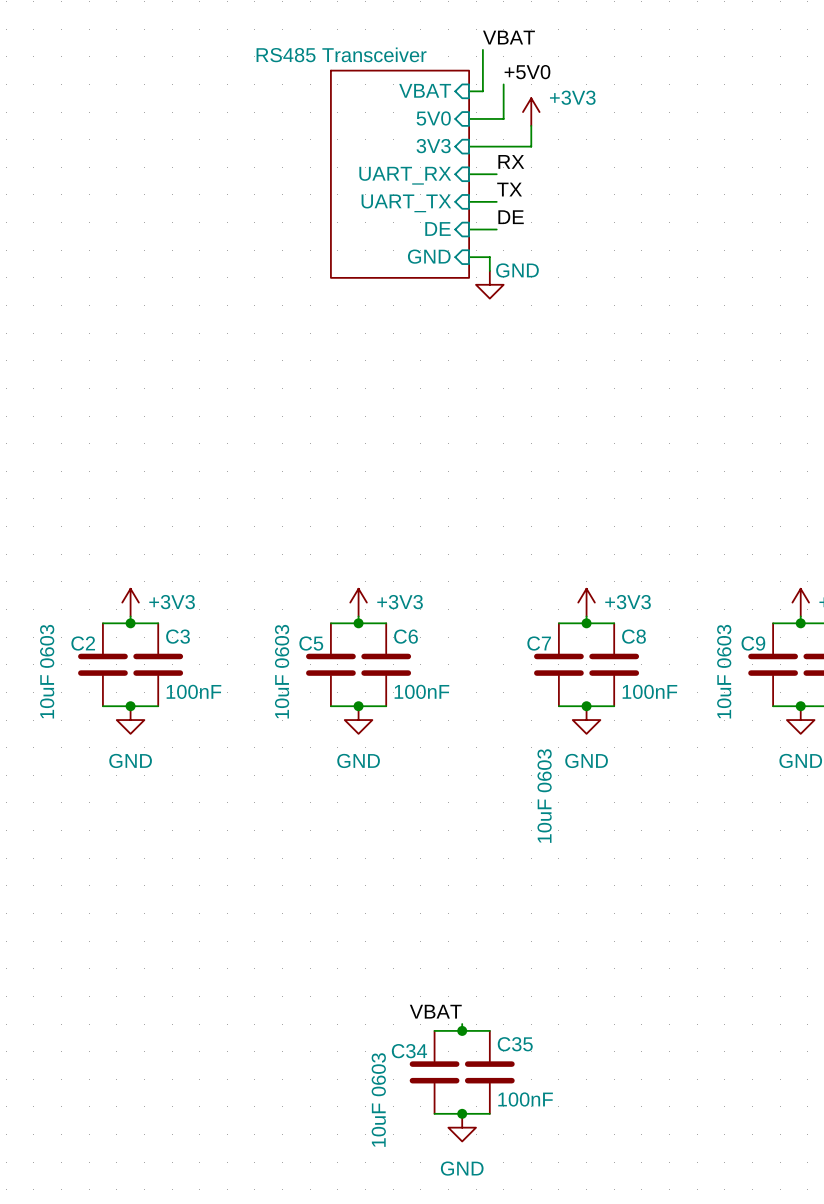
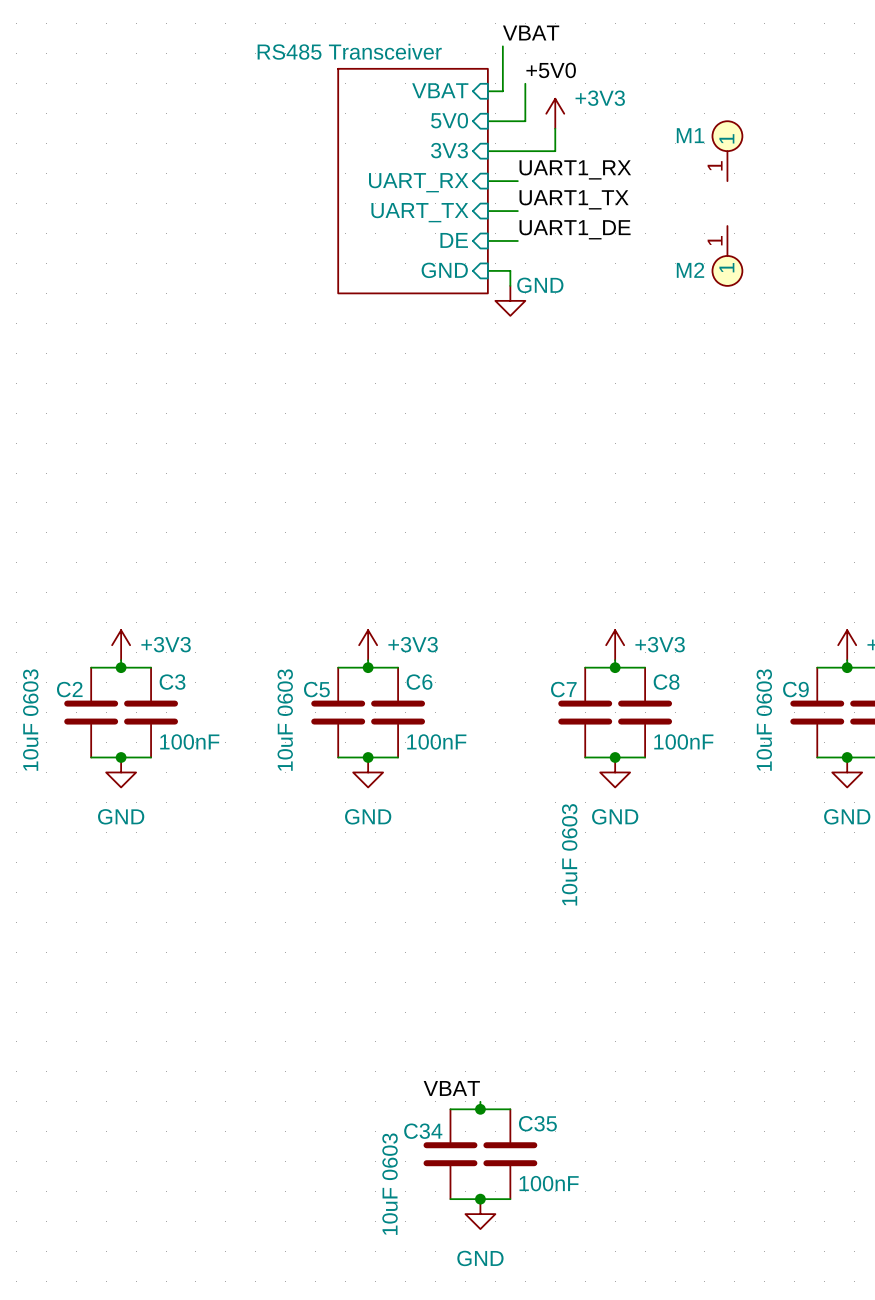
M1: none -> (727, 151)
label: RX (511, 161) -> UART1_RX (575, 169)
label: TX (509, 189) -> UART1_TX (574, 199)
label: DE (511, 217) -> UART1_DE (575, 229)
M2: none -> (727, 255)

